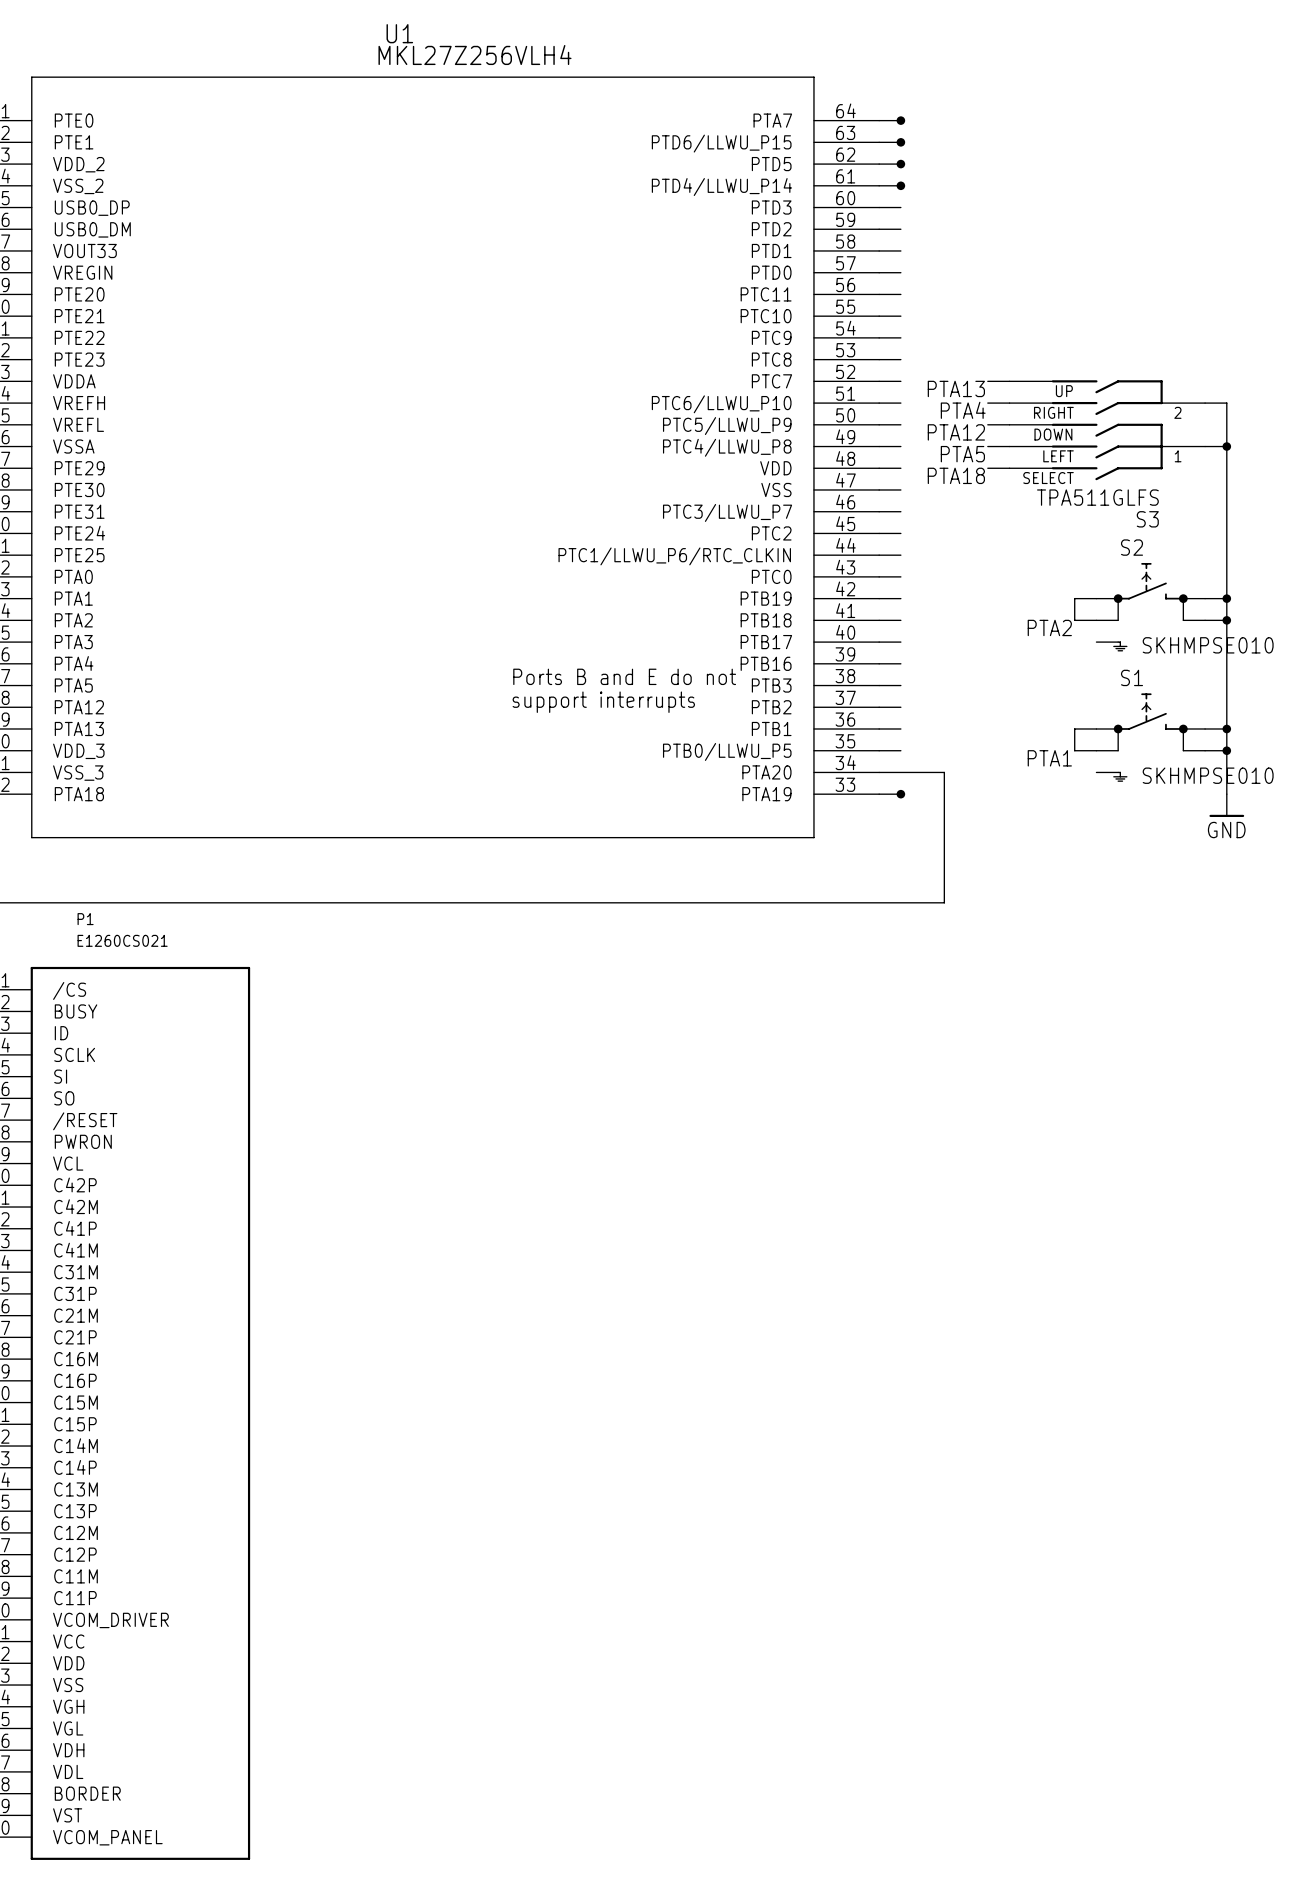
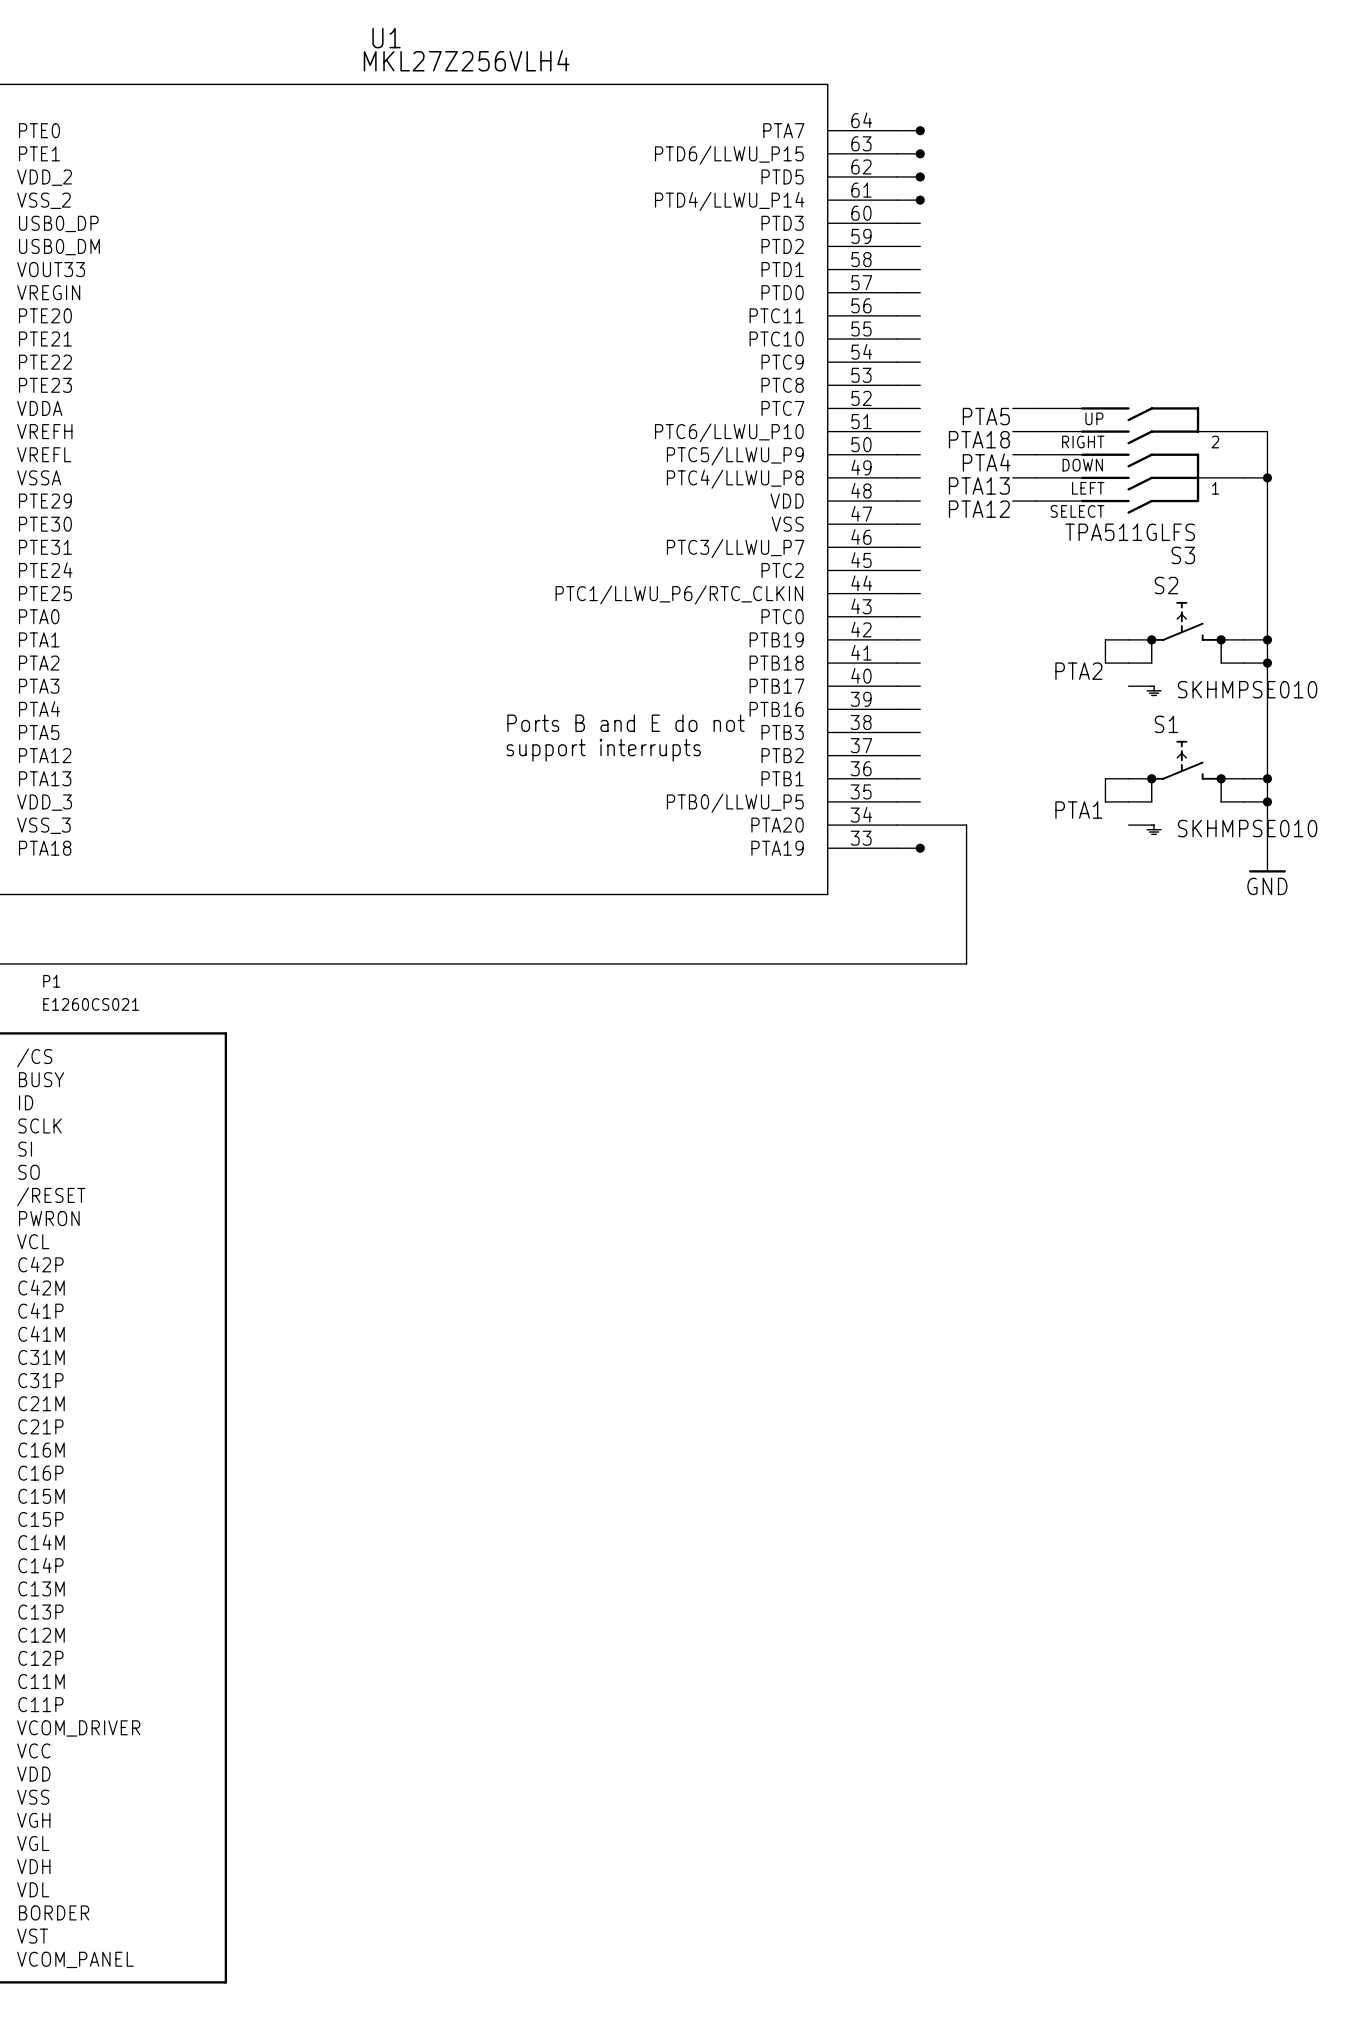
label: PTA13 (956, 388) -> PTA5 (986, 416)
label: PTA4 (963, 410) -> PTA18 (979, 439)
label: PTA12 (956, 432) -> PTA4 (986, 462)
label: PTA5 (962, 454) -> PTA13 (979, 485)
label: PTA18 (956, 475) -> PTA12 (979, 509)

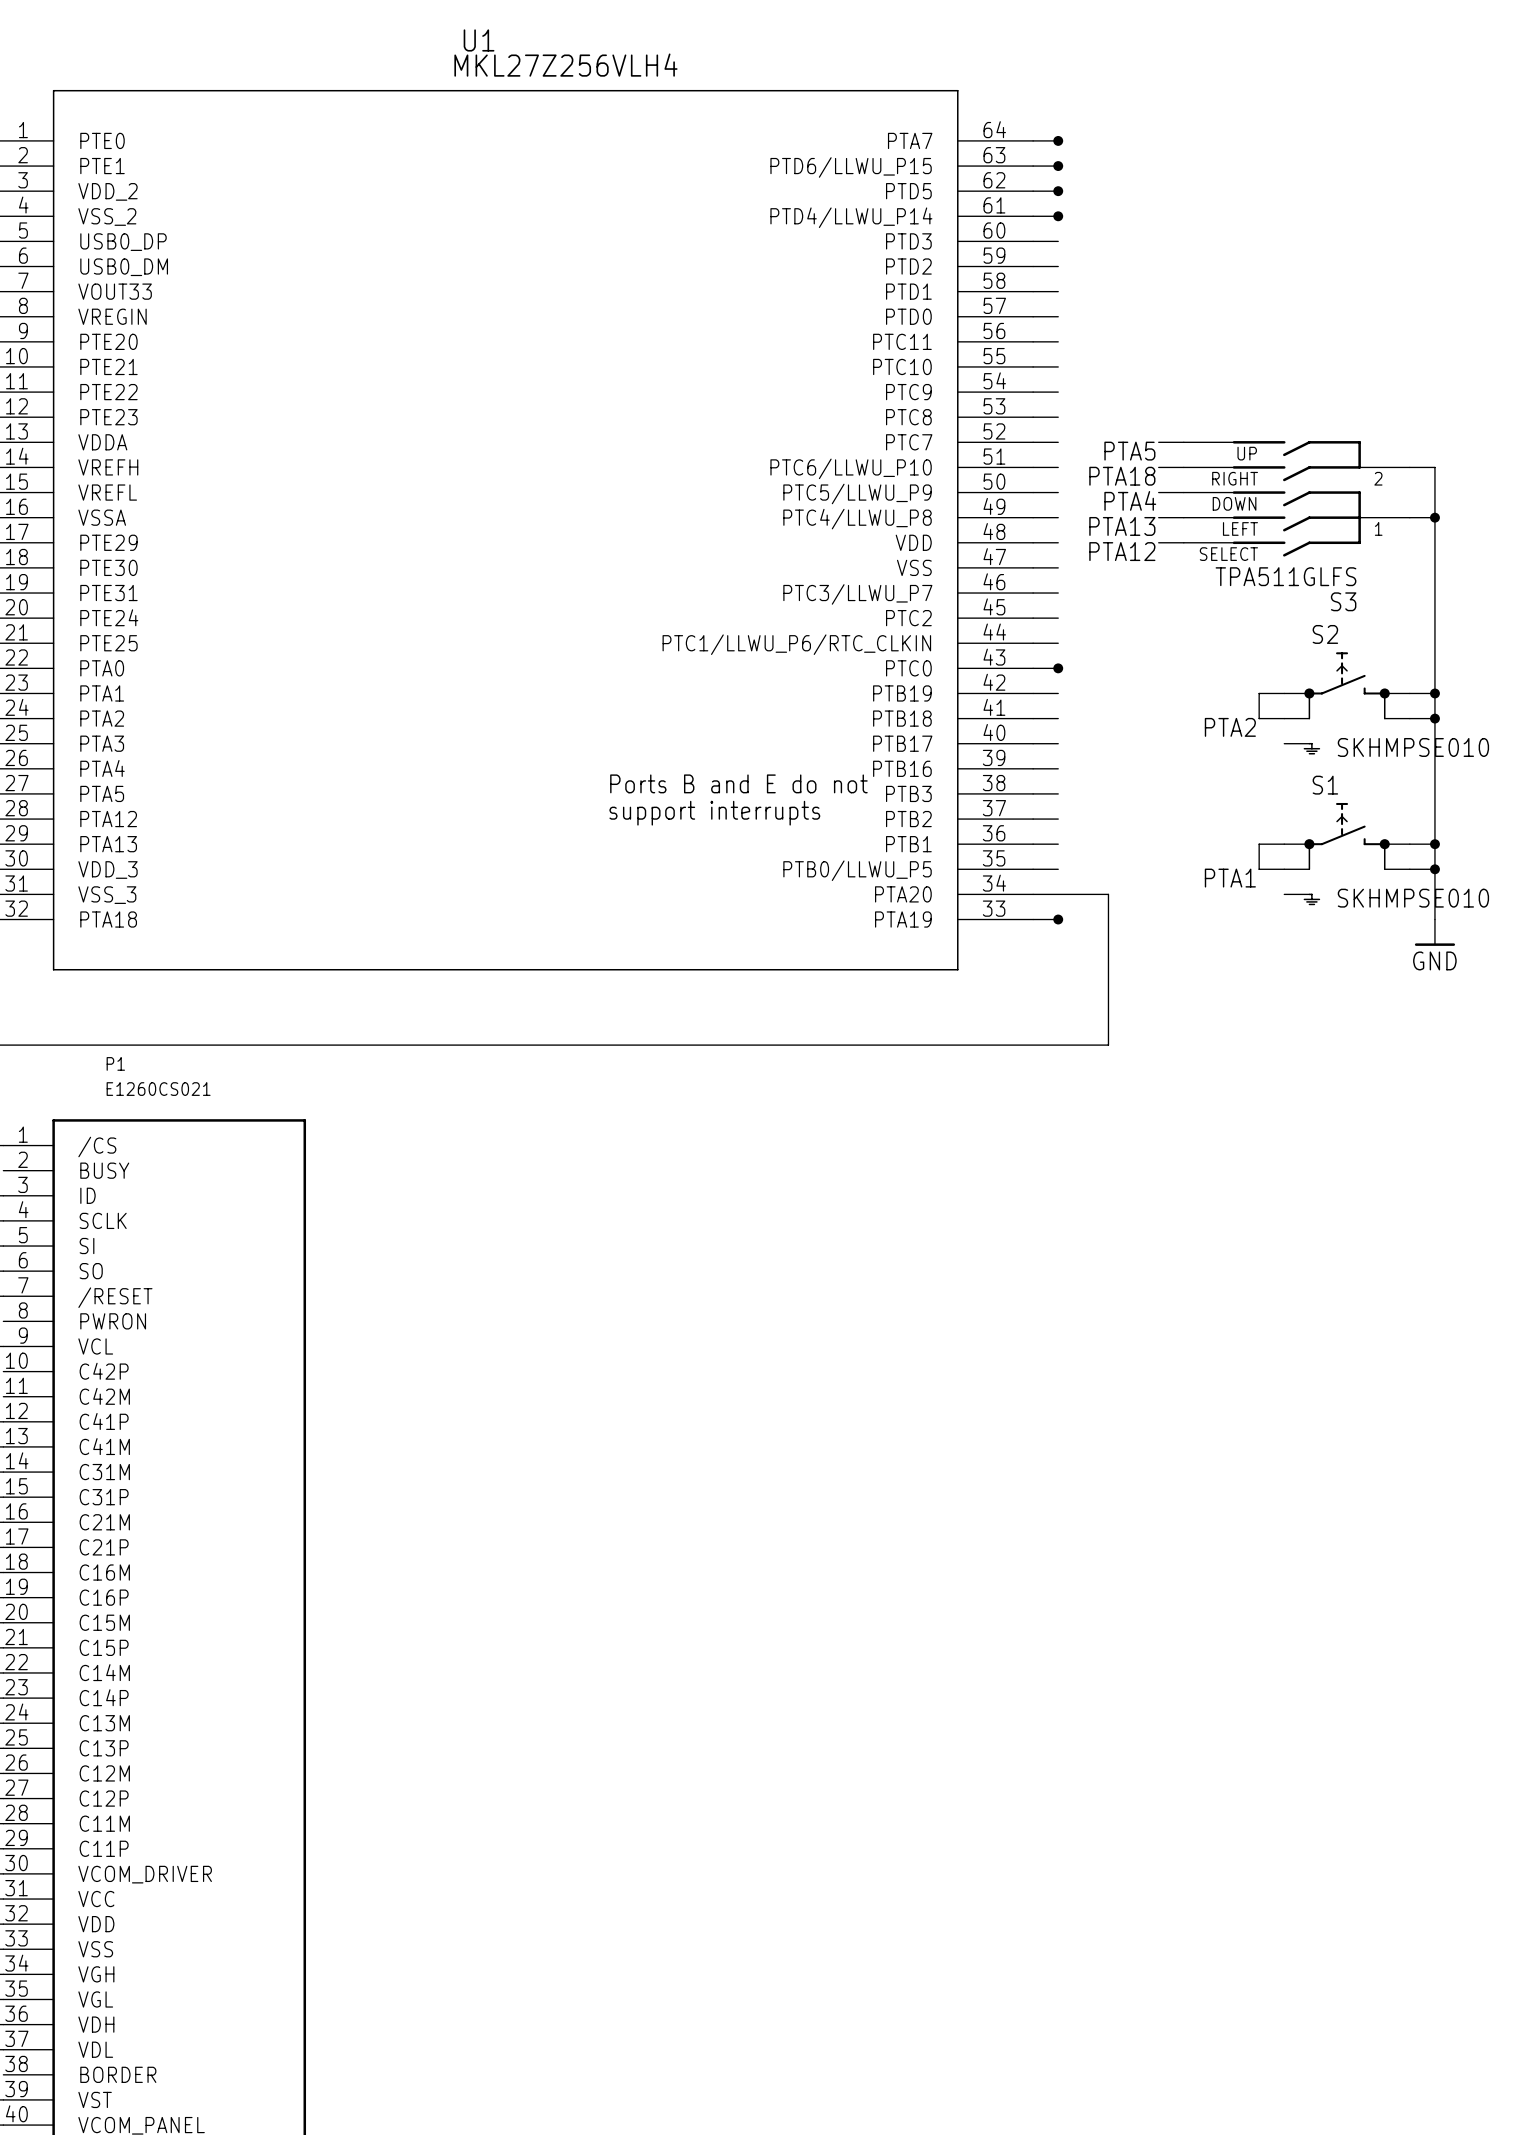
junction: none -> (1058, 668)

